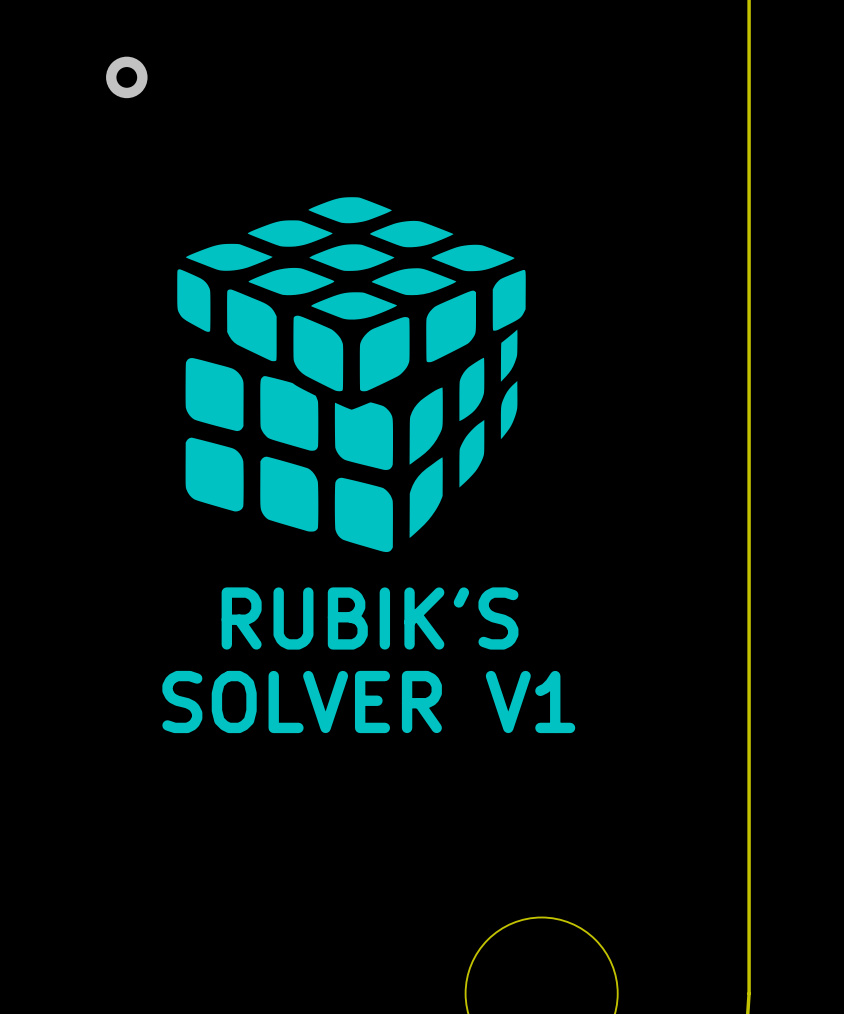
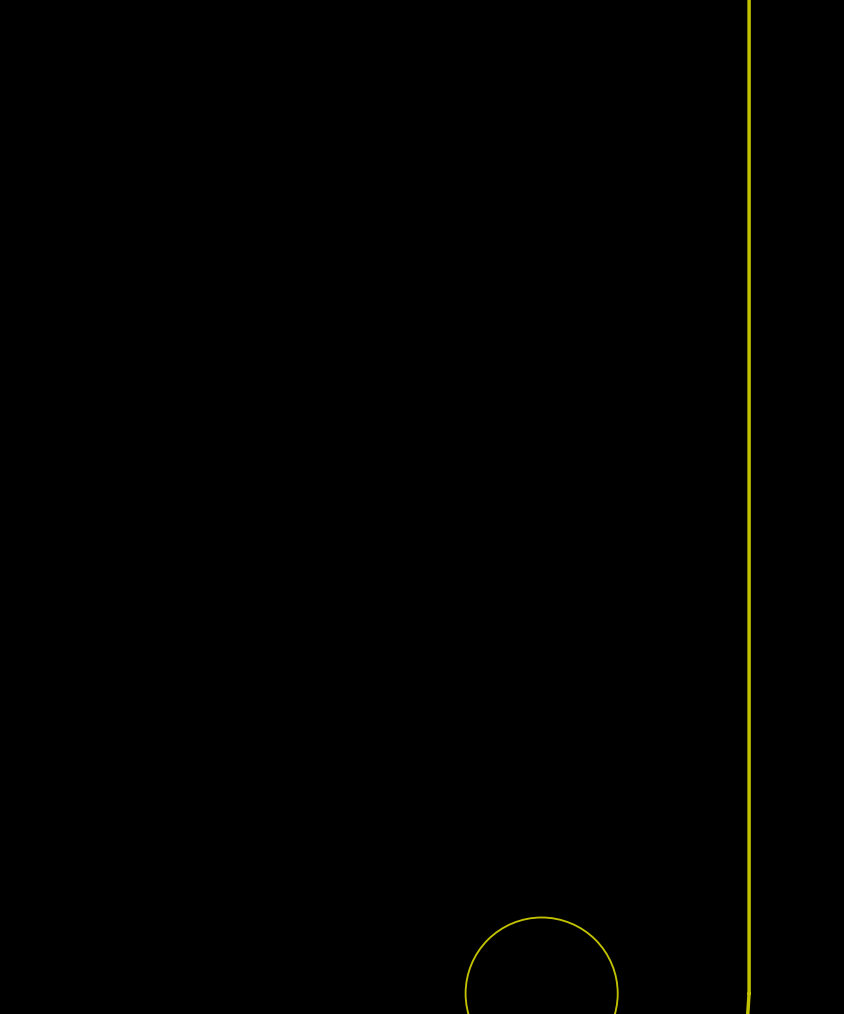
via: (126, 77) -> none
drawing: [177, 197, 526, 553] -> none
text: RUBIK'S (370, 618) -> none
text: SOLVER V1 (368, 701) -> none

